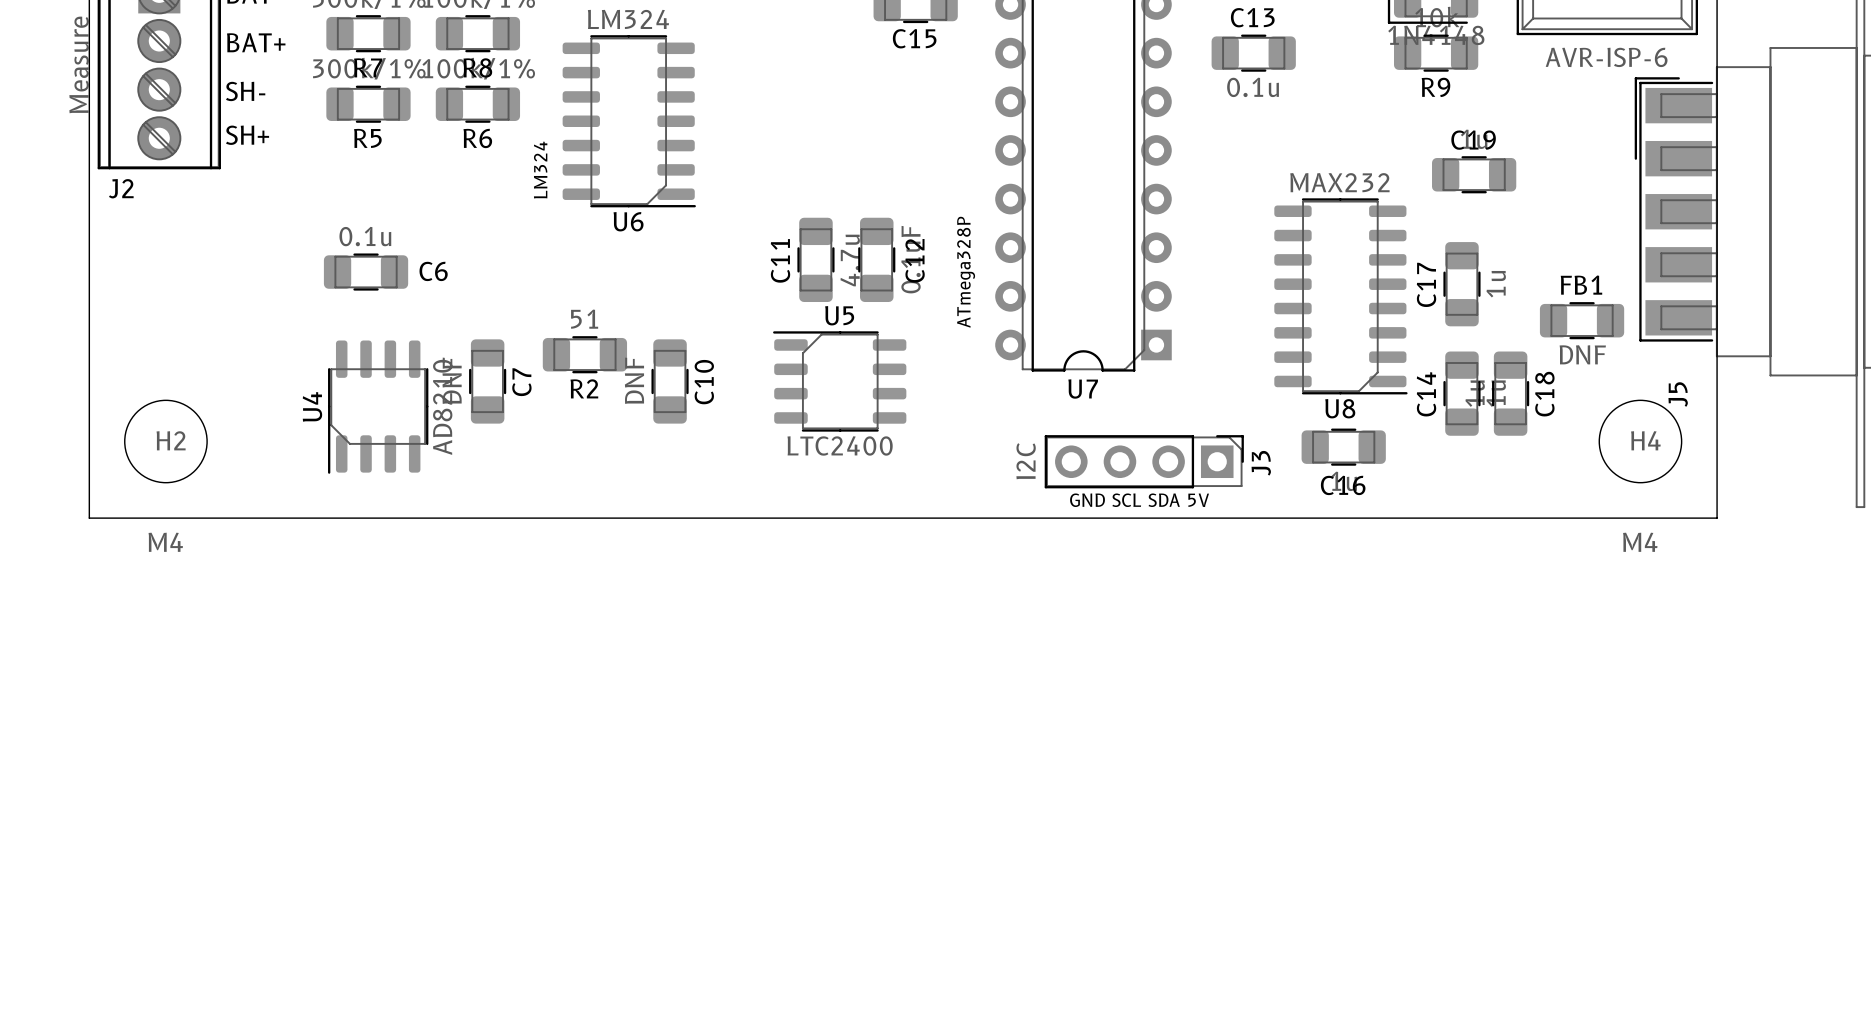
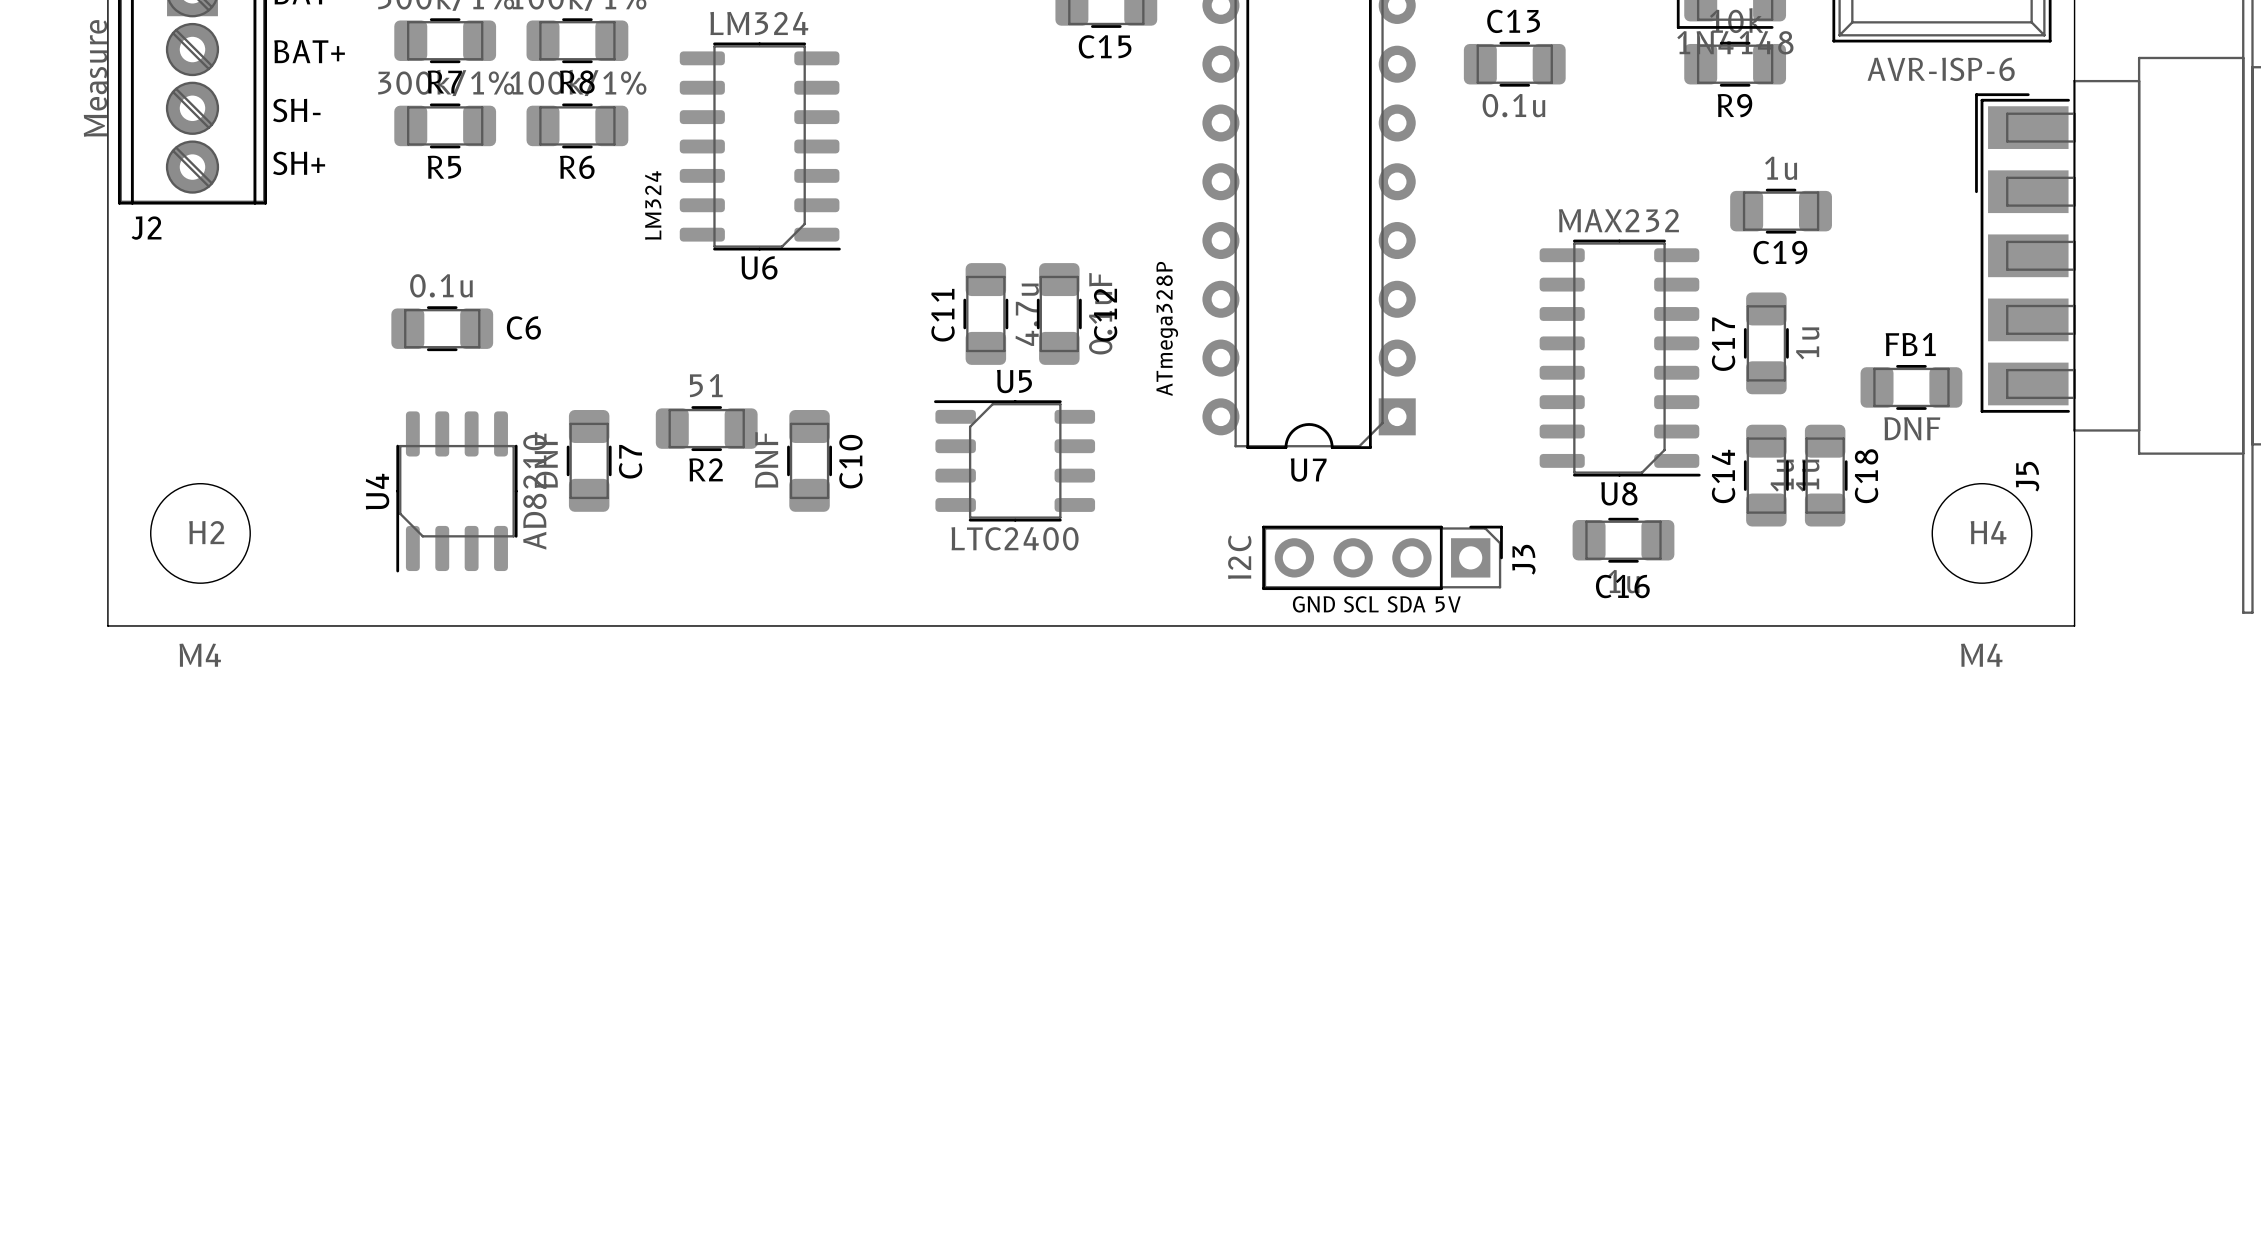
C19 name position: C19 (1473, 140) -> C19 (1780, 252)

